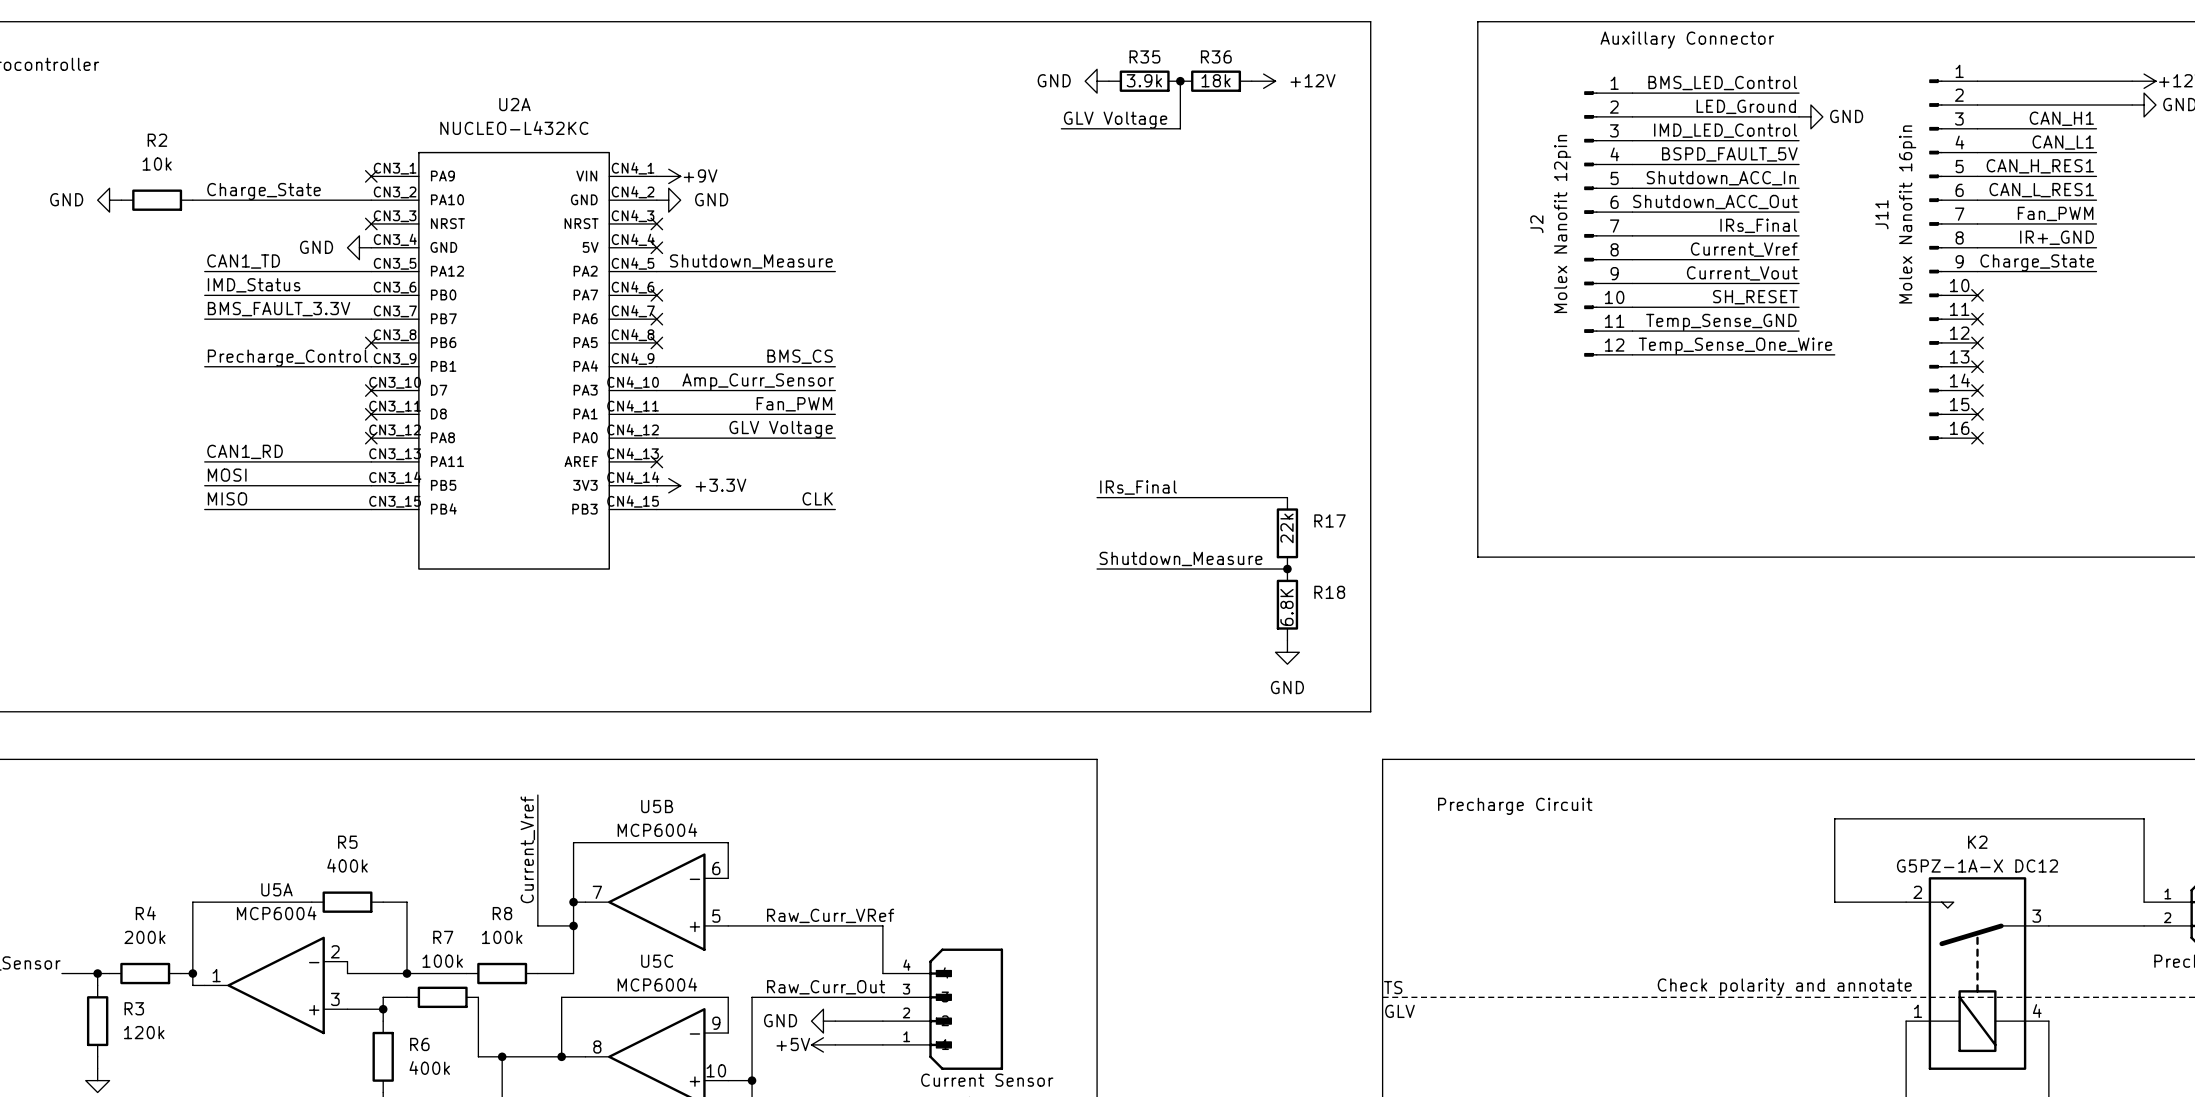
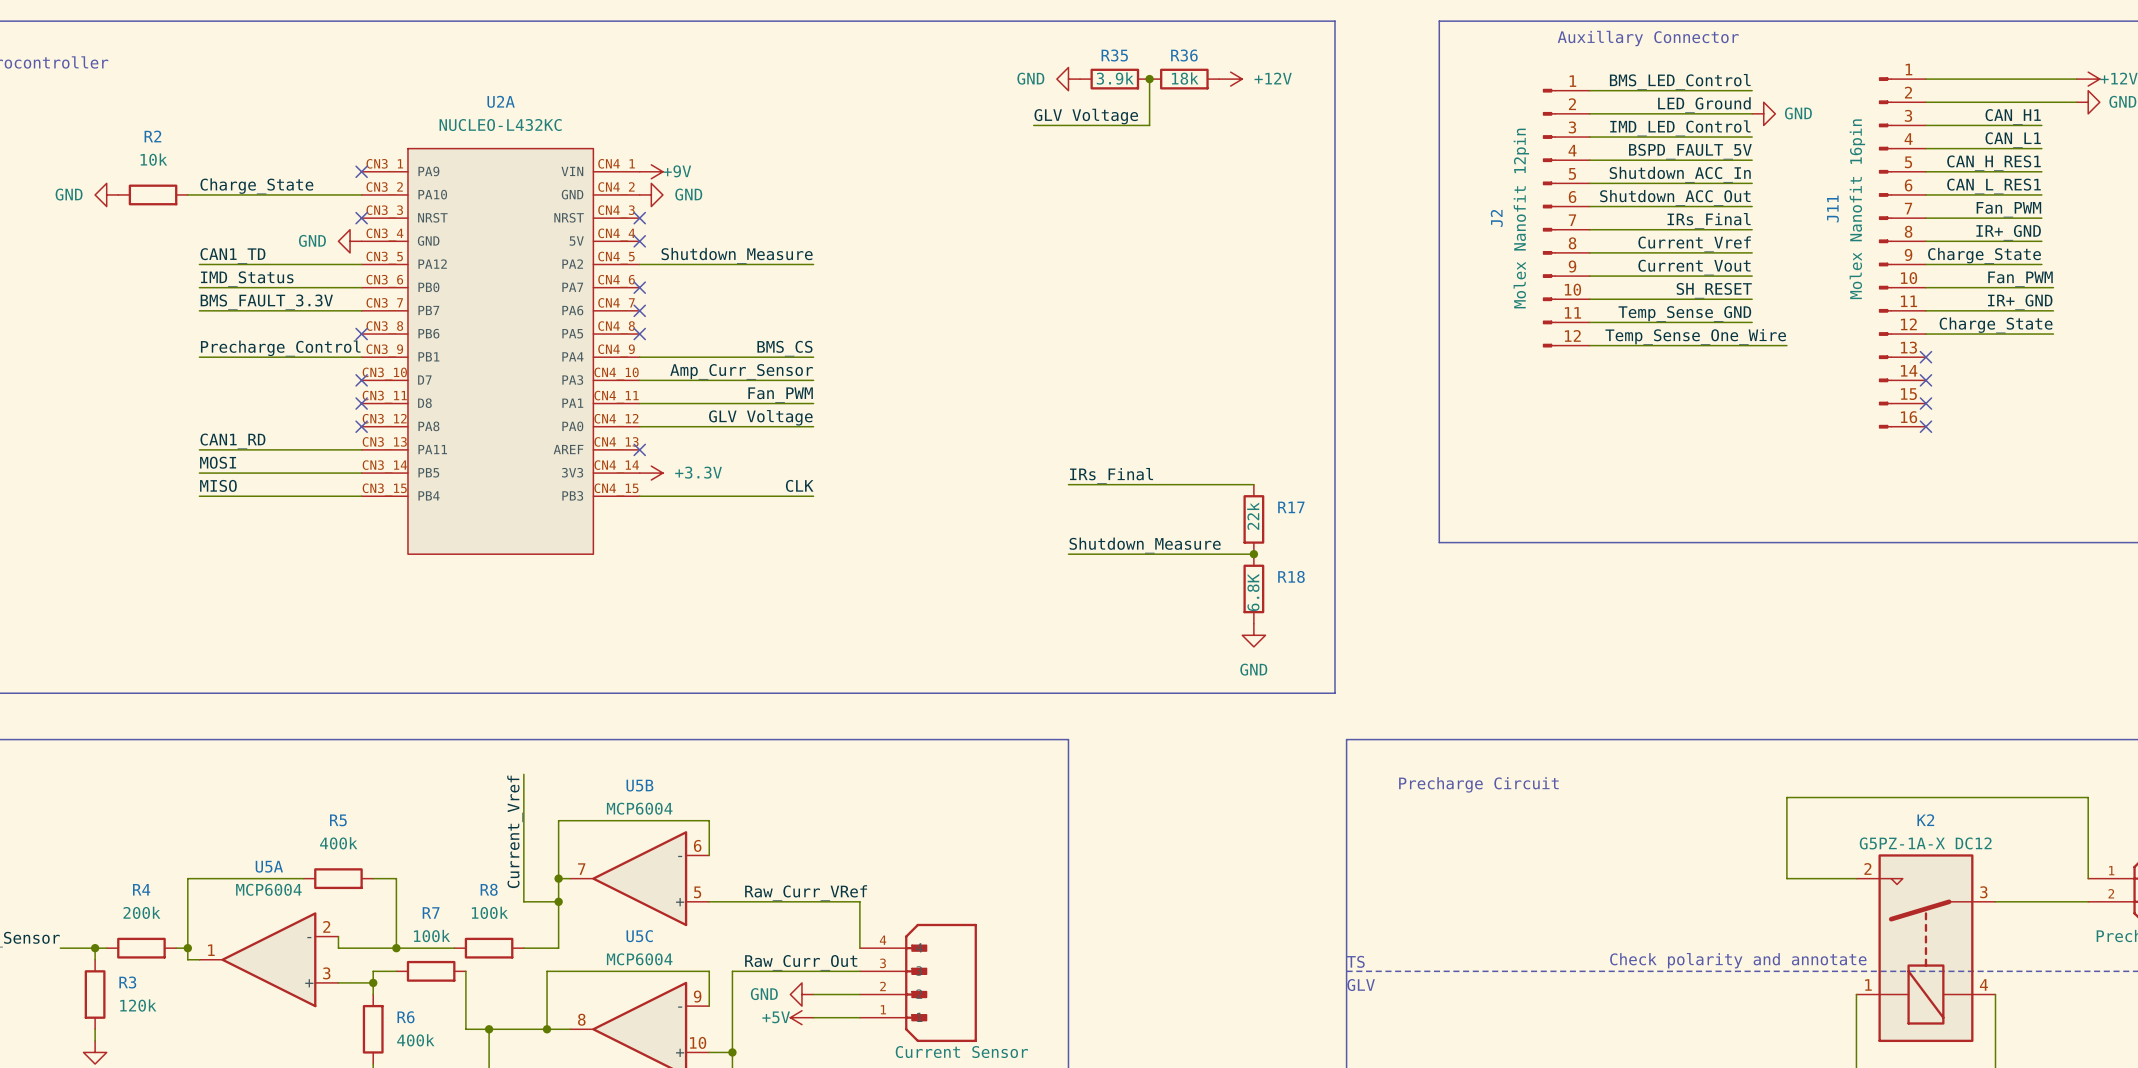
label: none -> Fan_PWM (2020, 279)
wire: none -> (1925, 287) (2053, 287)
no-connect mark: (1977, 295) -> none
label: none -> IR+_GND (2020, 302)
wire: none -> (1925, 310) (2053, 310)
no-connect mark: (1977, 319) -> none
label: none -> Charge_State (1996, 325)
wire: none -> (1925, 334) (2053, 334)
no-connect mark: (1977, 342) -> none

